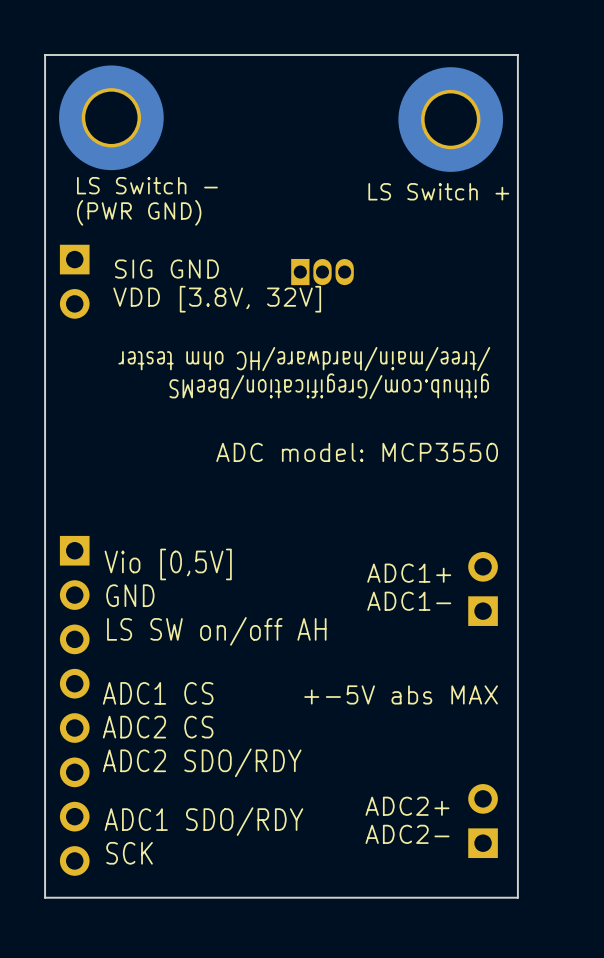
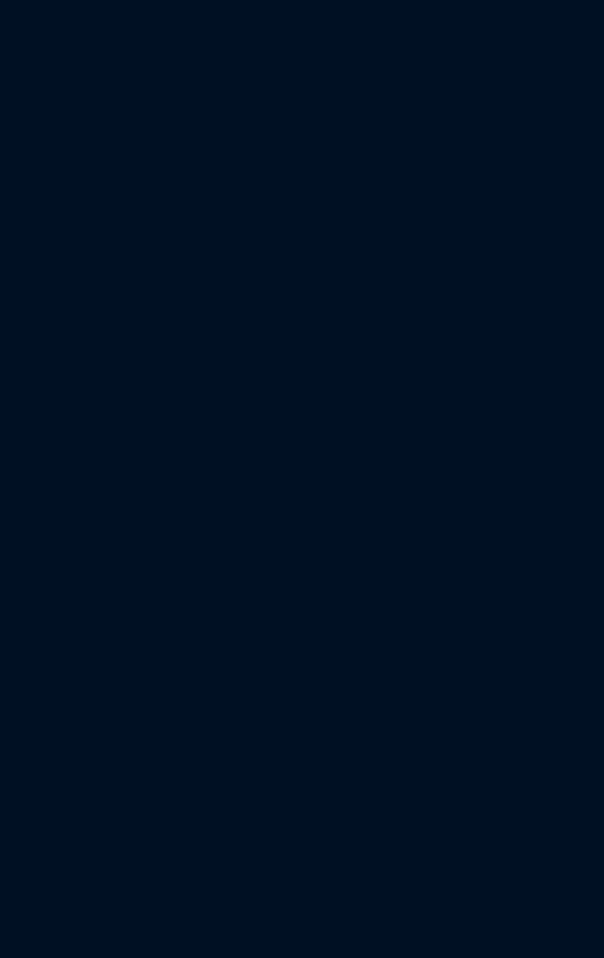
board edge: (517, 54) (45, 54) (45, 897) (517, 897) (517, 54) -> none
part: (111, 117) -> none
part: (450, 119) -> none
text: LS Switch - (147, 185) -> none
text: LS Switch + (438, 191) -> none
text: (PWR GND) (139, 212) -> none
text: SIG GND (166, 269) -> none
part: (322, 272) -> none
part: (74, 281) -> none
text: VDD [3.8V, 32V] (217, 299) -> none
text: /tree/main/hardware/HC ohm tester (304, 359) -> none
text: github.com/Gregification/BeeMS (329, 386) -> none
text: ADC model: MCP3550 (357, 452) -> none
text: Vio [0,5V] (168, 564) -> none
text: ADC1+ (409, 573) -> none
part: (483, 588) -> none
text: GND (130, 595) -> none
text: ADC1- (409, 601) -> none
text: LS SW on/off AH (216, 631) -> none
text: ADC1 CS (158, 693) -> none
text: +-5V abs MAX (401, 694) -> none
part: (74, 705) -> none
text: ADC2 CS (158, 727) -> none
text: ADC2 SDO/RDY (202, 762) -> none
text: ADC2+ (407, 806) -> none
text: ADC1 SDO/RDY (203, 821) -> none
part: (483, 821) -> none
text: ADC2- (407, 834) -> none
text: SCK (129, 853) -> none

